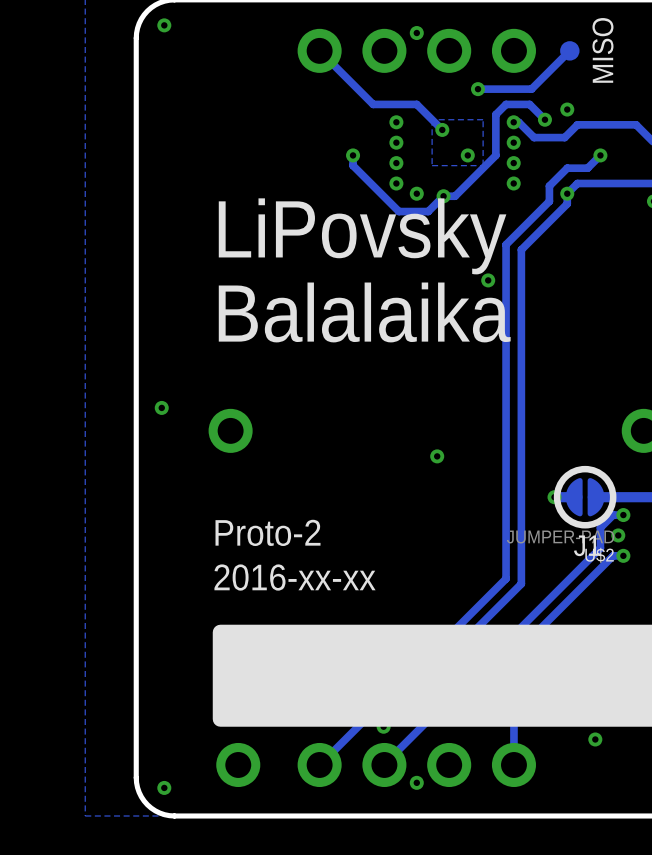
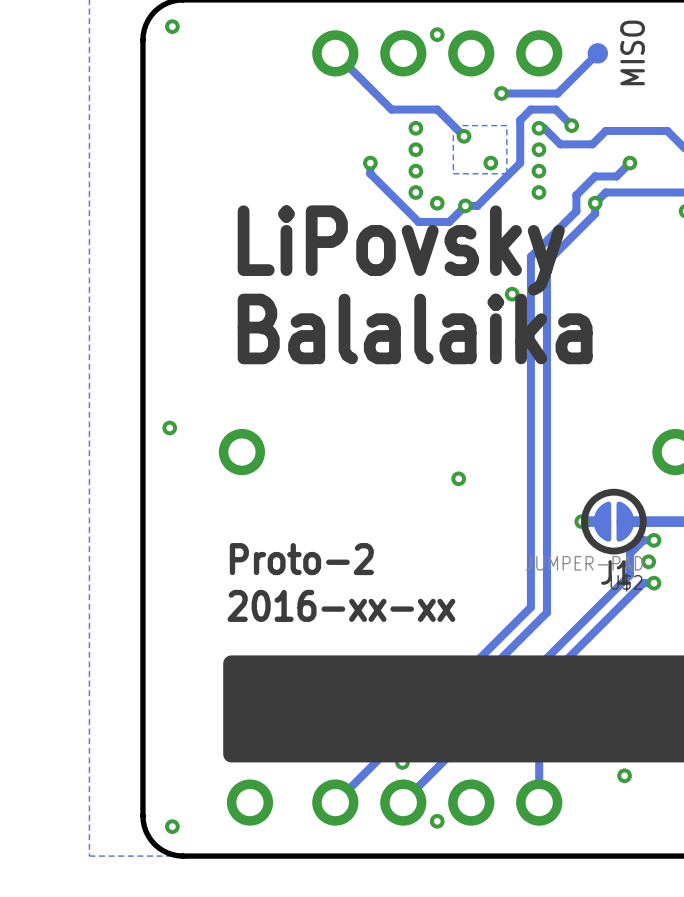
via: (567, 109) -> none

